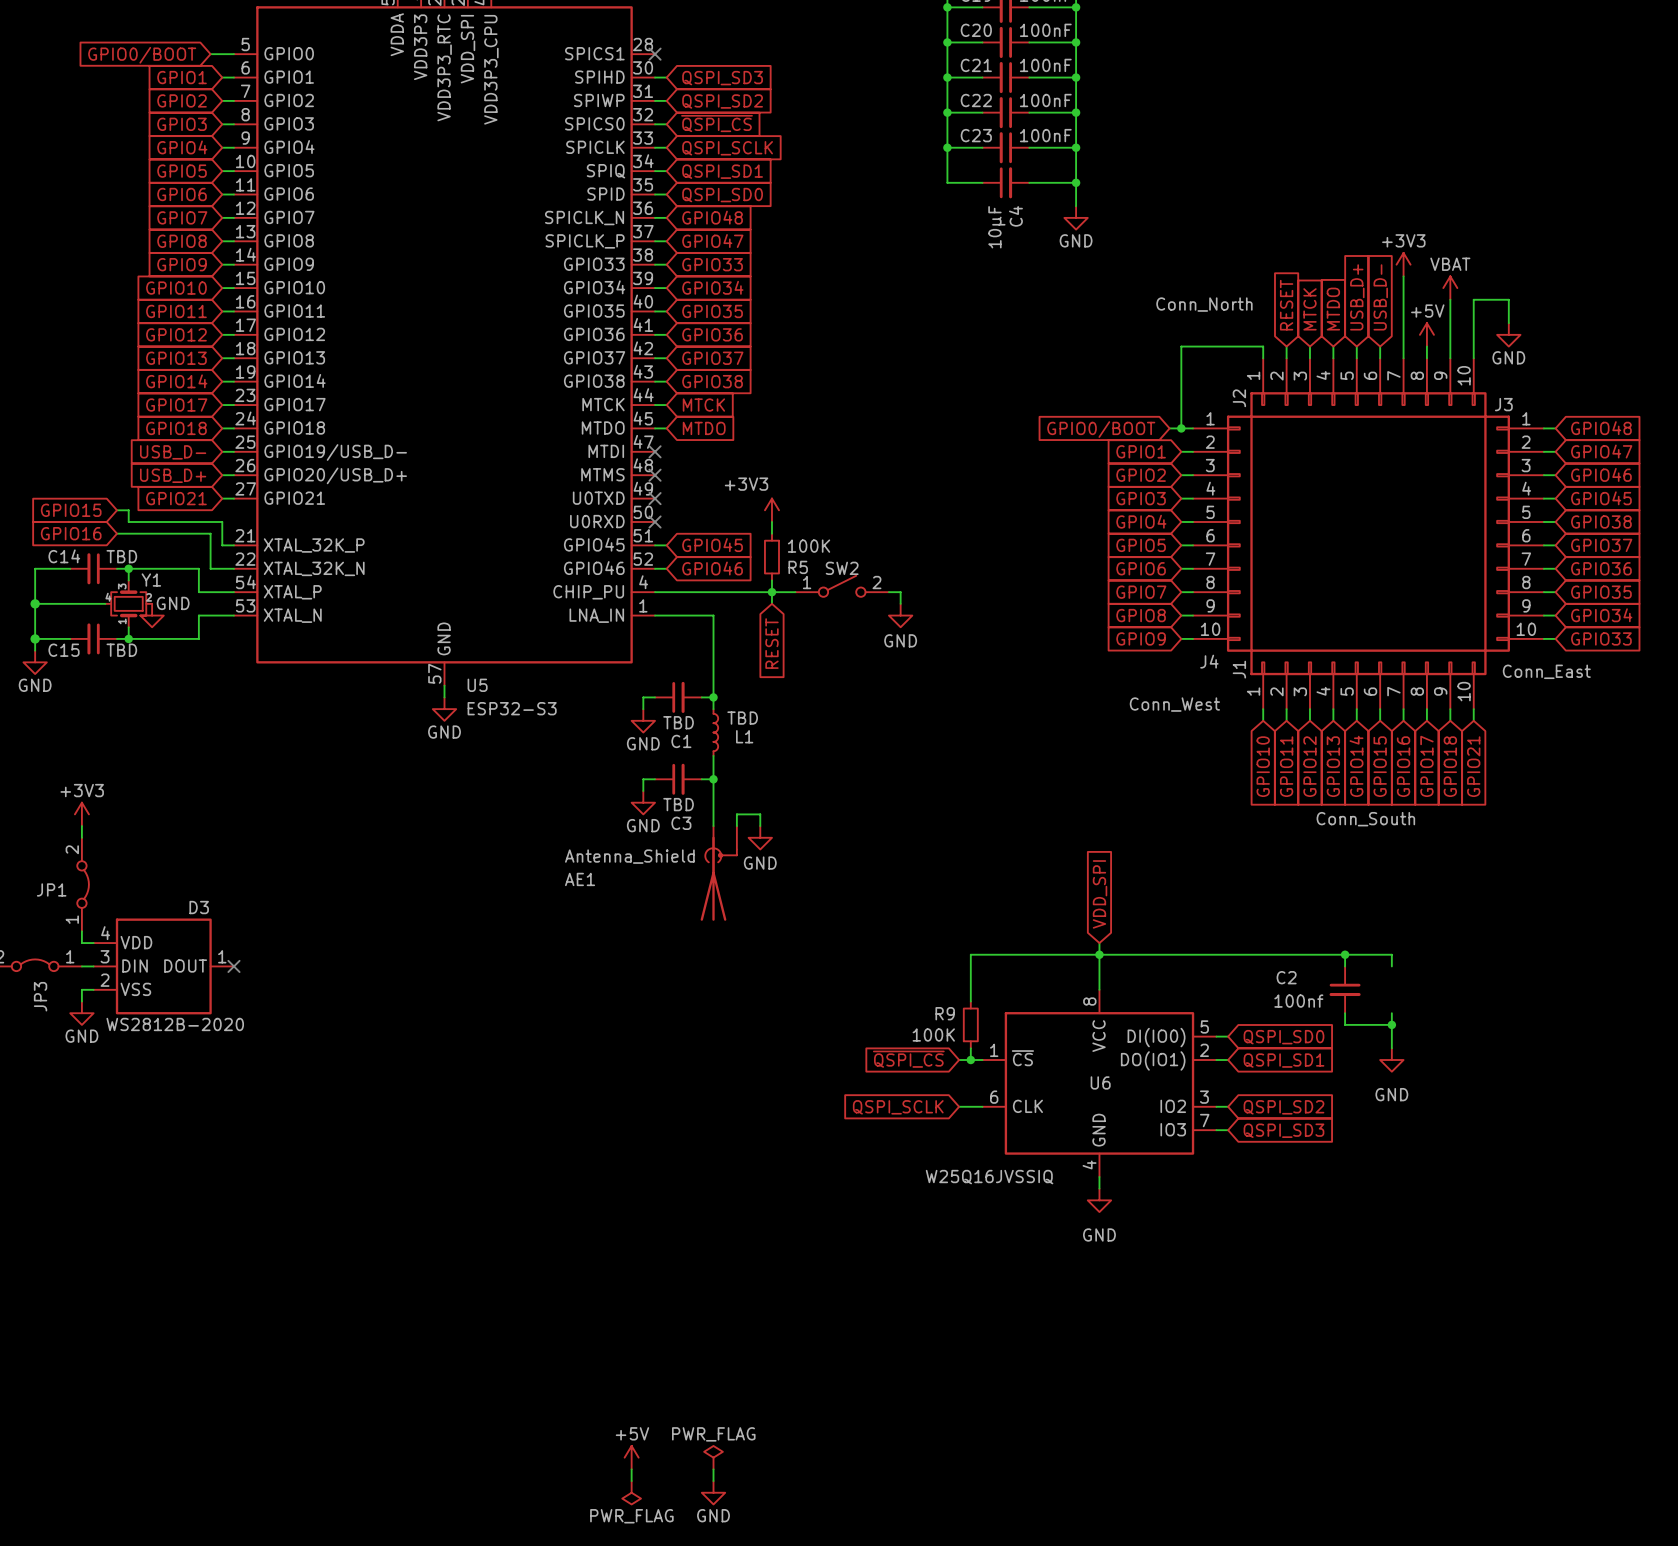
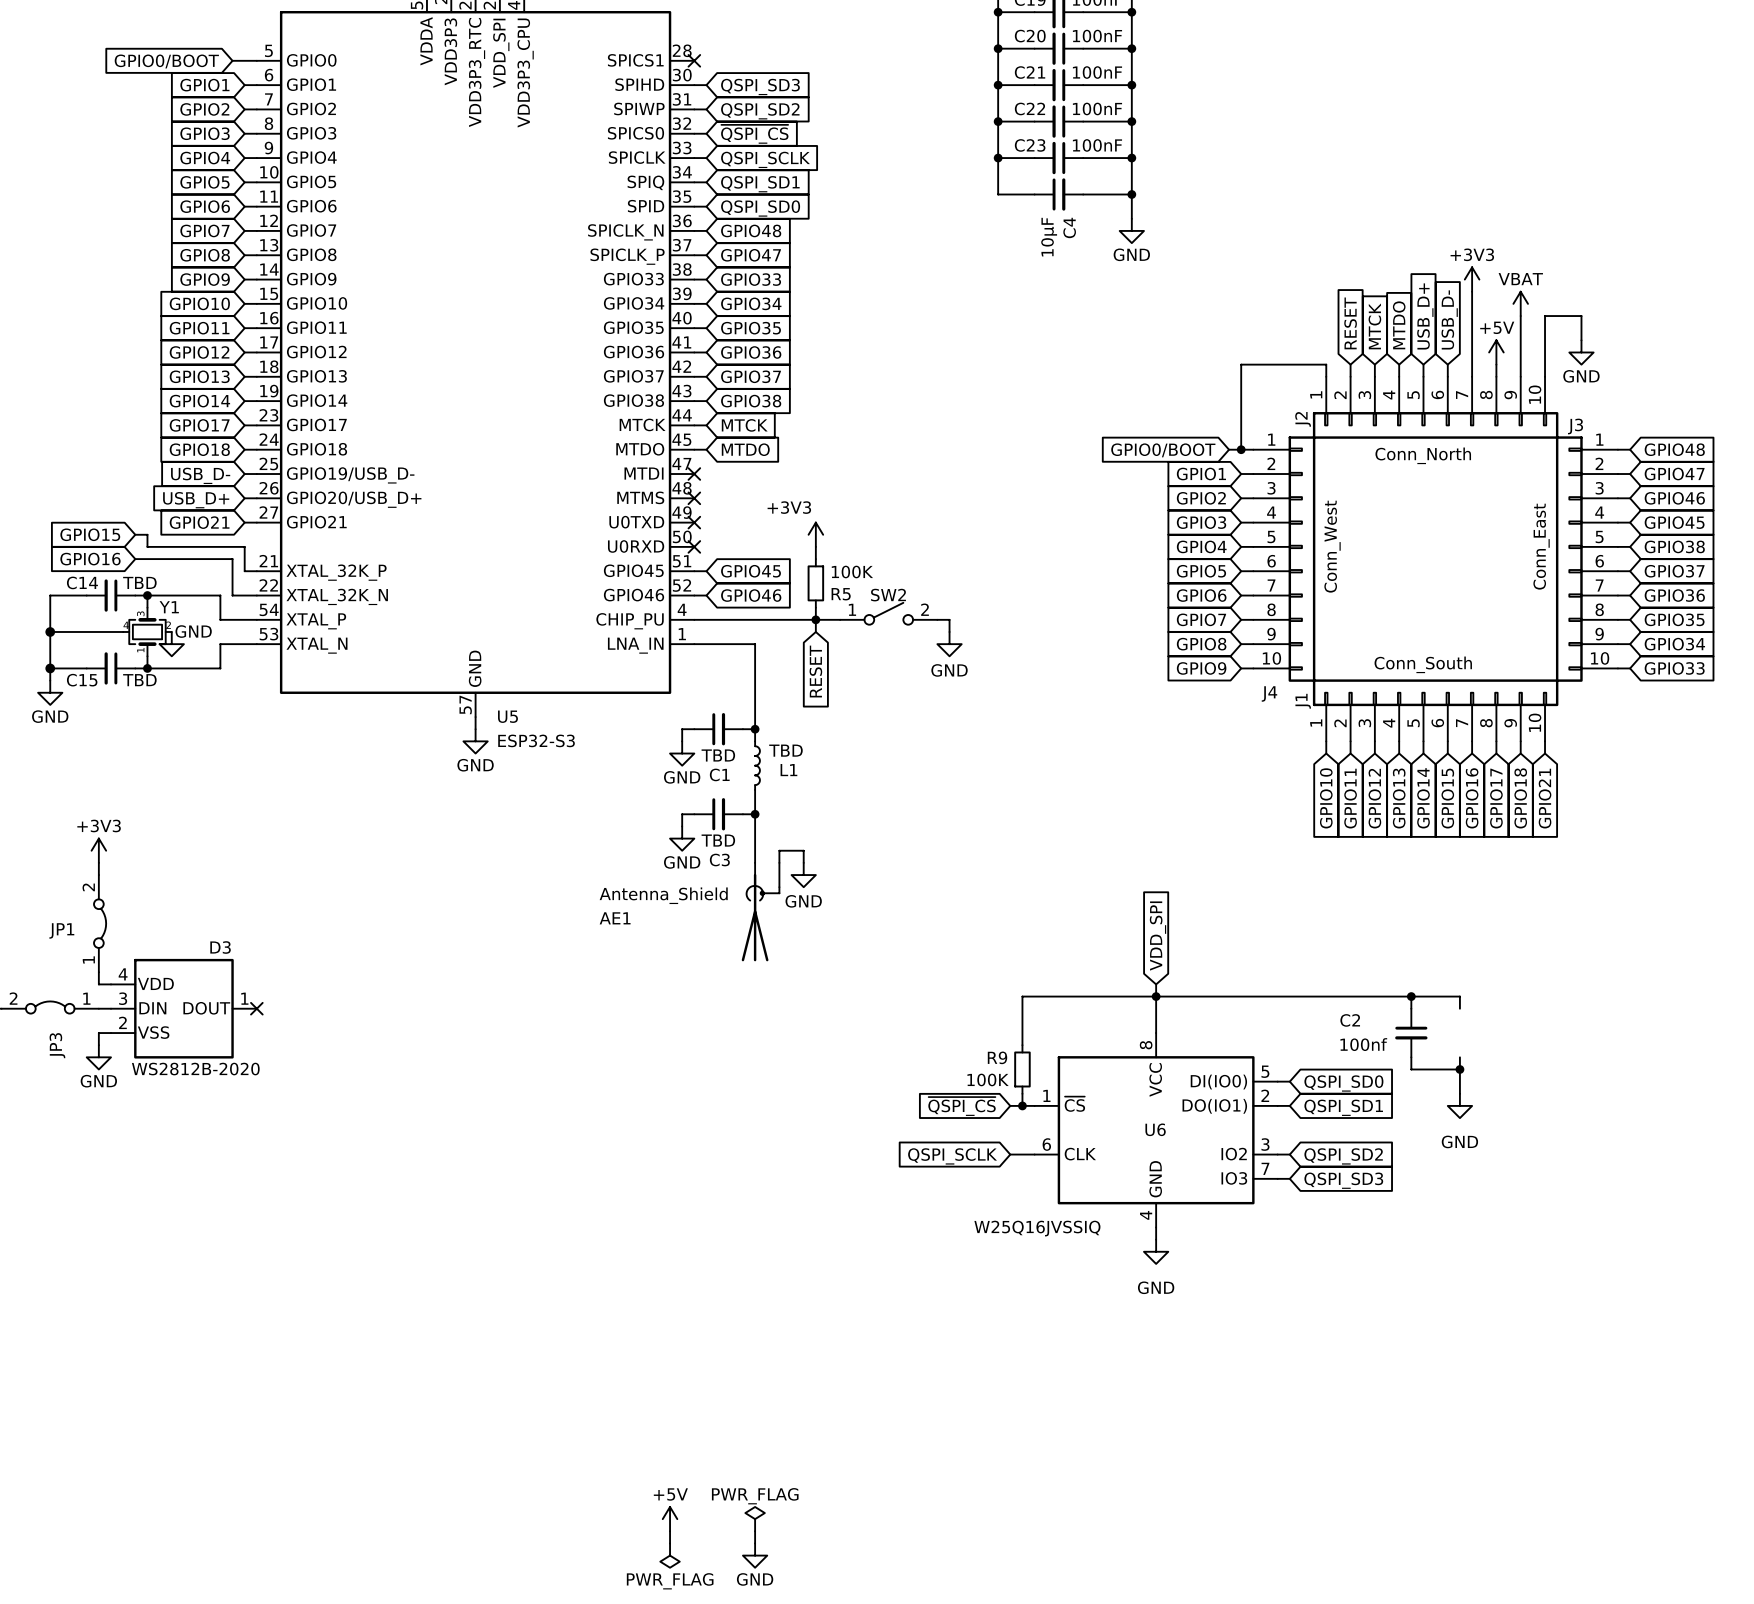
J2 value position: Conn_North (1204, 304) -> Conn_North (1423, 455)
J3 value rotation: 0° (1546, 671) -> 90° counterclockwise (1541, 546)
J3 value position: Conn_East (1546, 671) -> Conn_East (1541, 546)
J4 value rotation: 0° (1174, 704) -> 90° counterclockwise (1332, 546)
J4 value position: Conn_West (1174, 704) -> Conn_West (1332, 546)
J1 value position: Conn_South (1365, 819) -> Conn_South (1423, 664)

